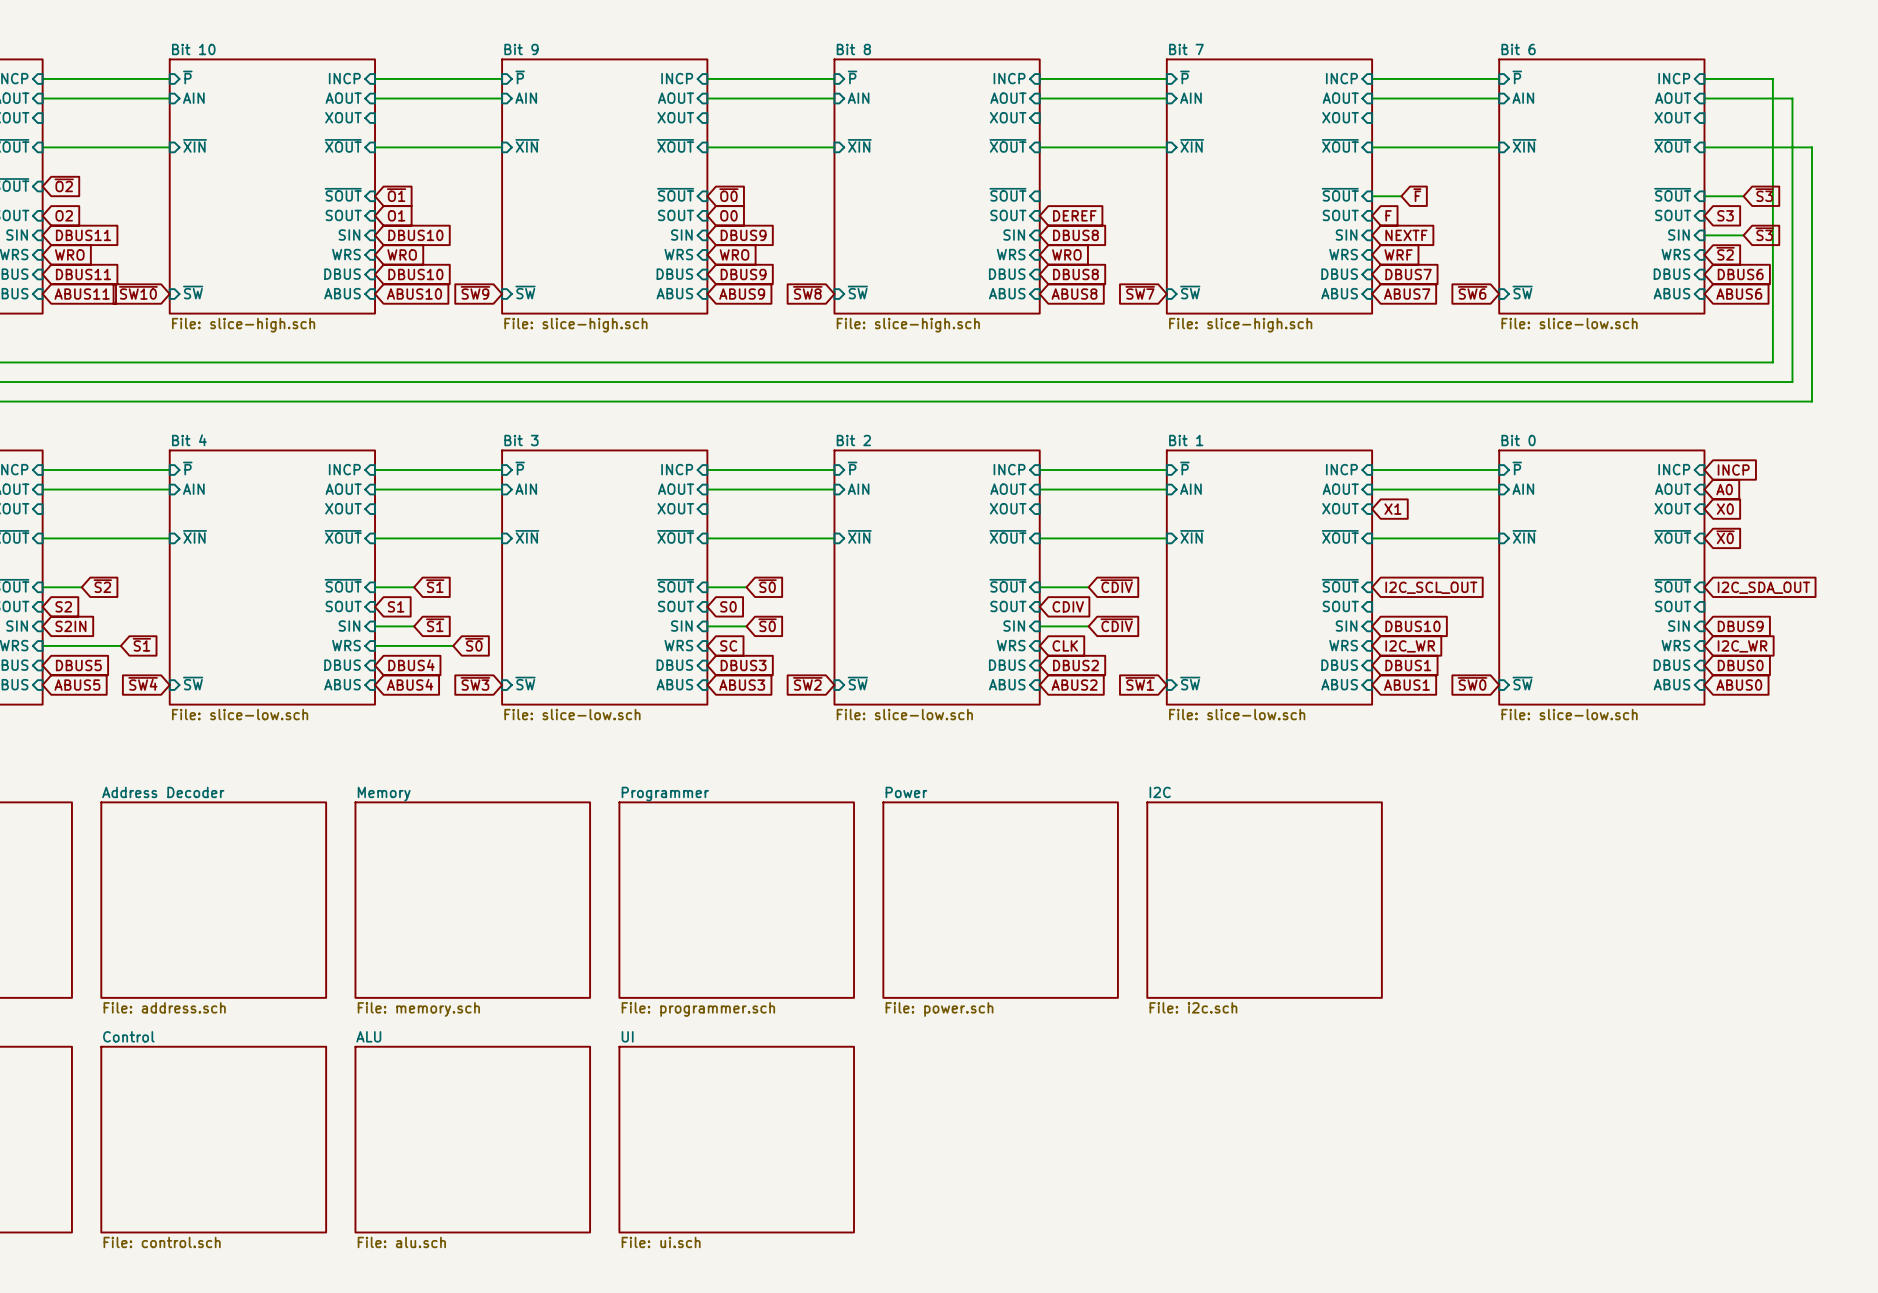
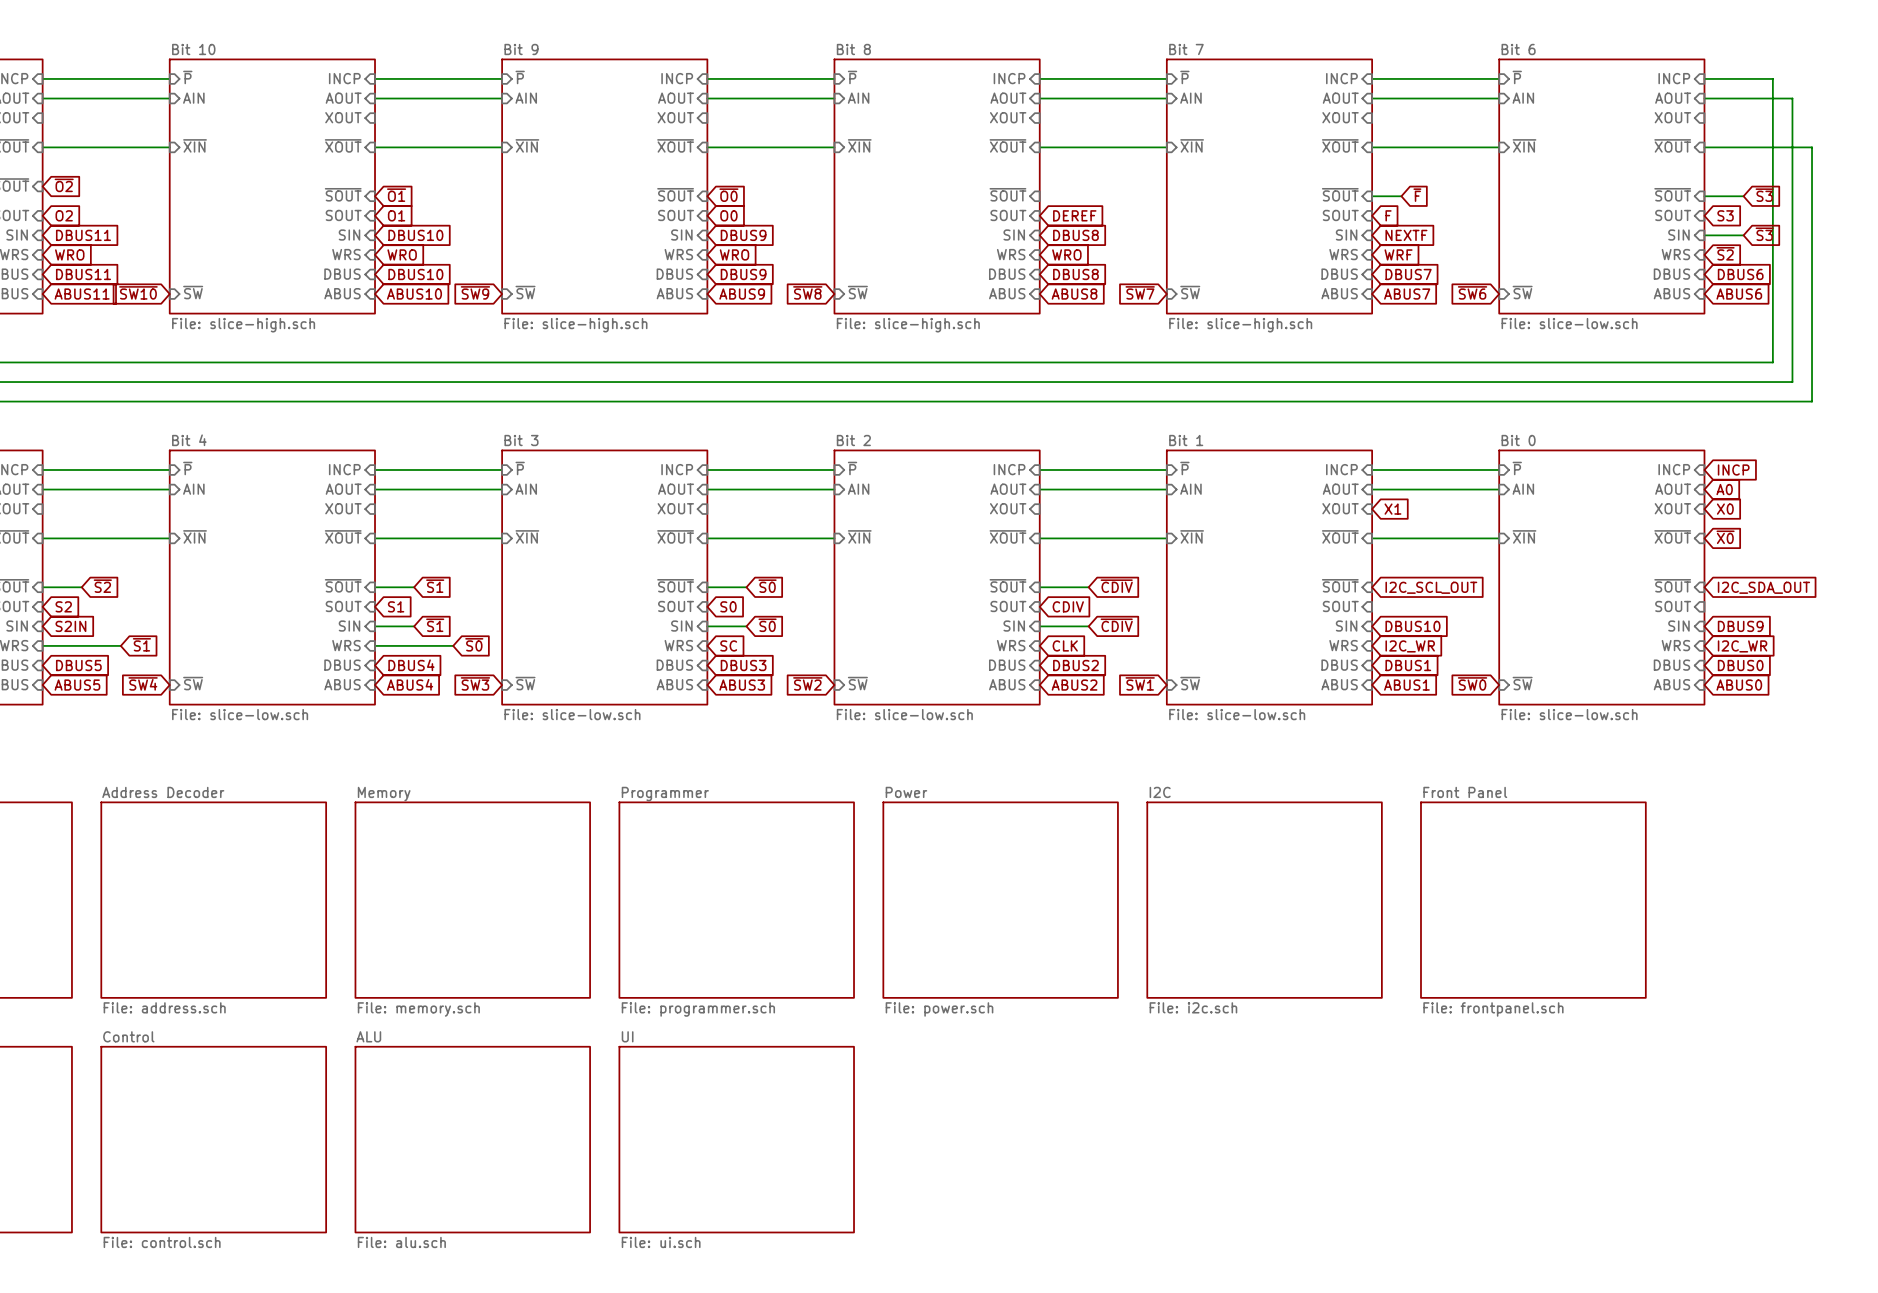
sheet Front Panel: none -> File: frontpanel.sch (1533, 900)

